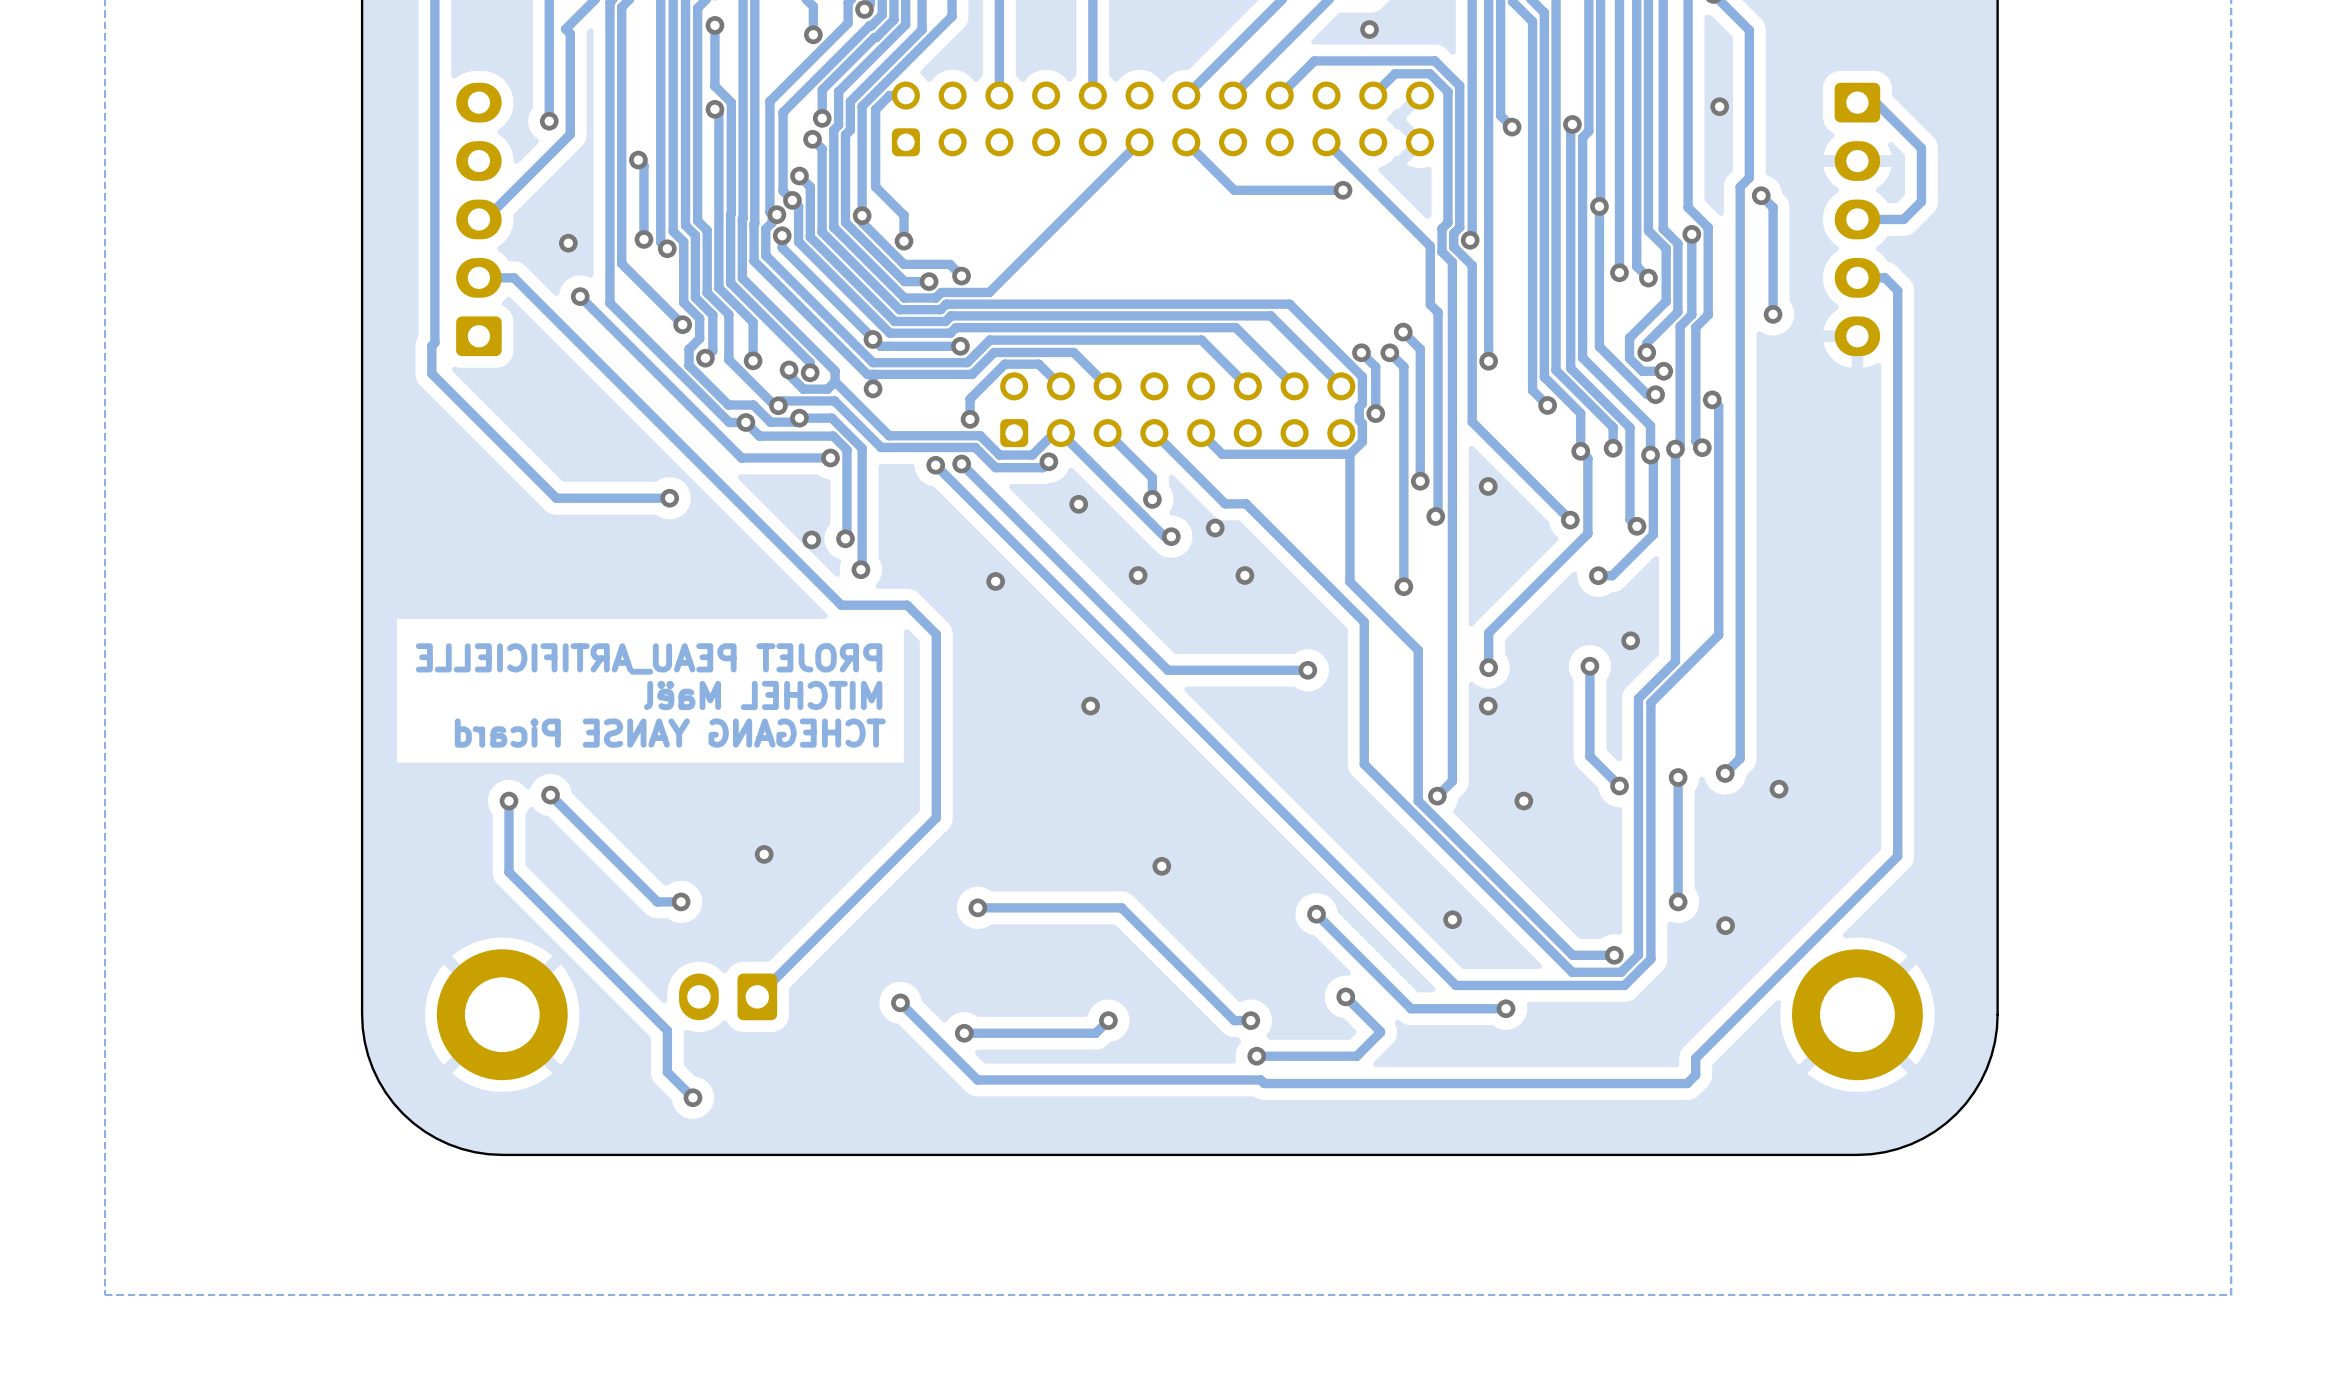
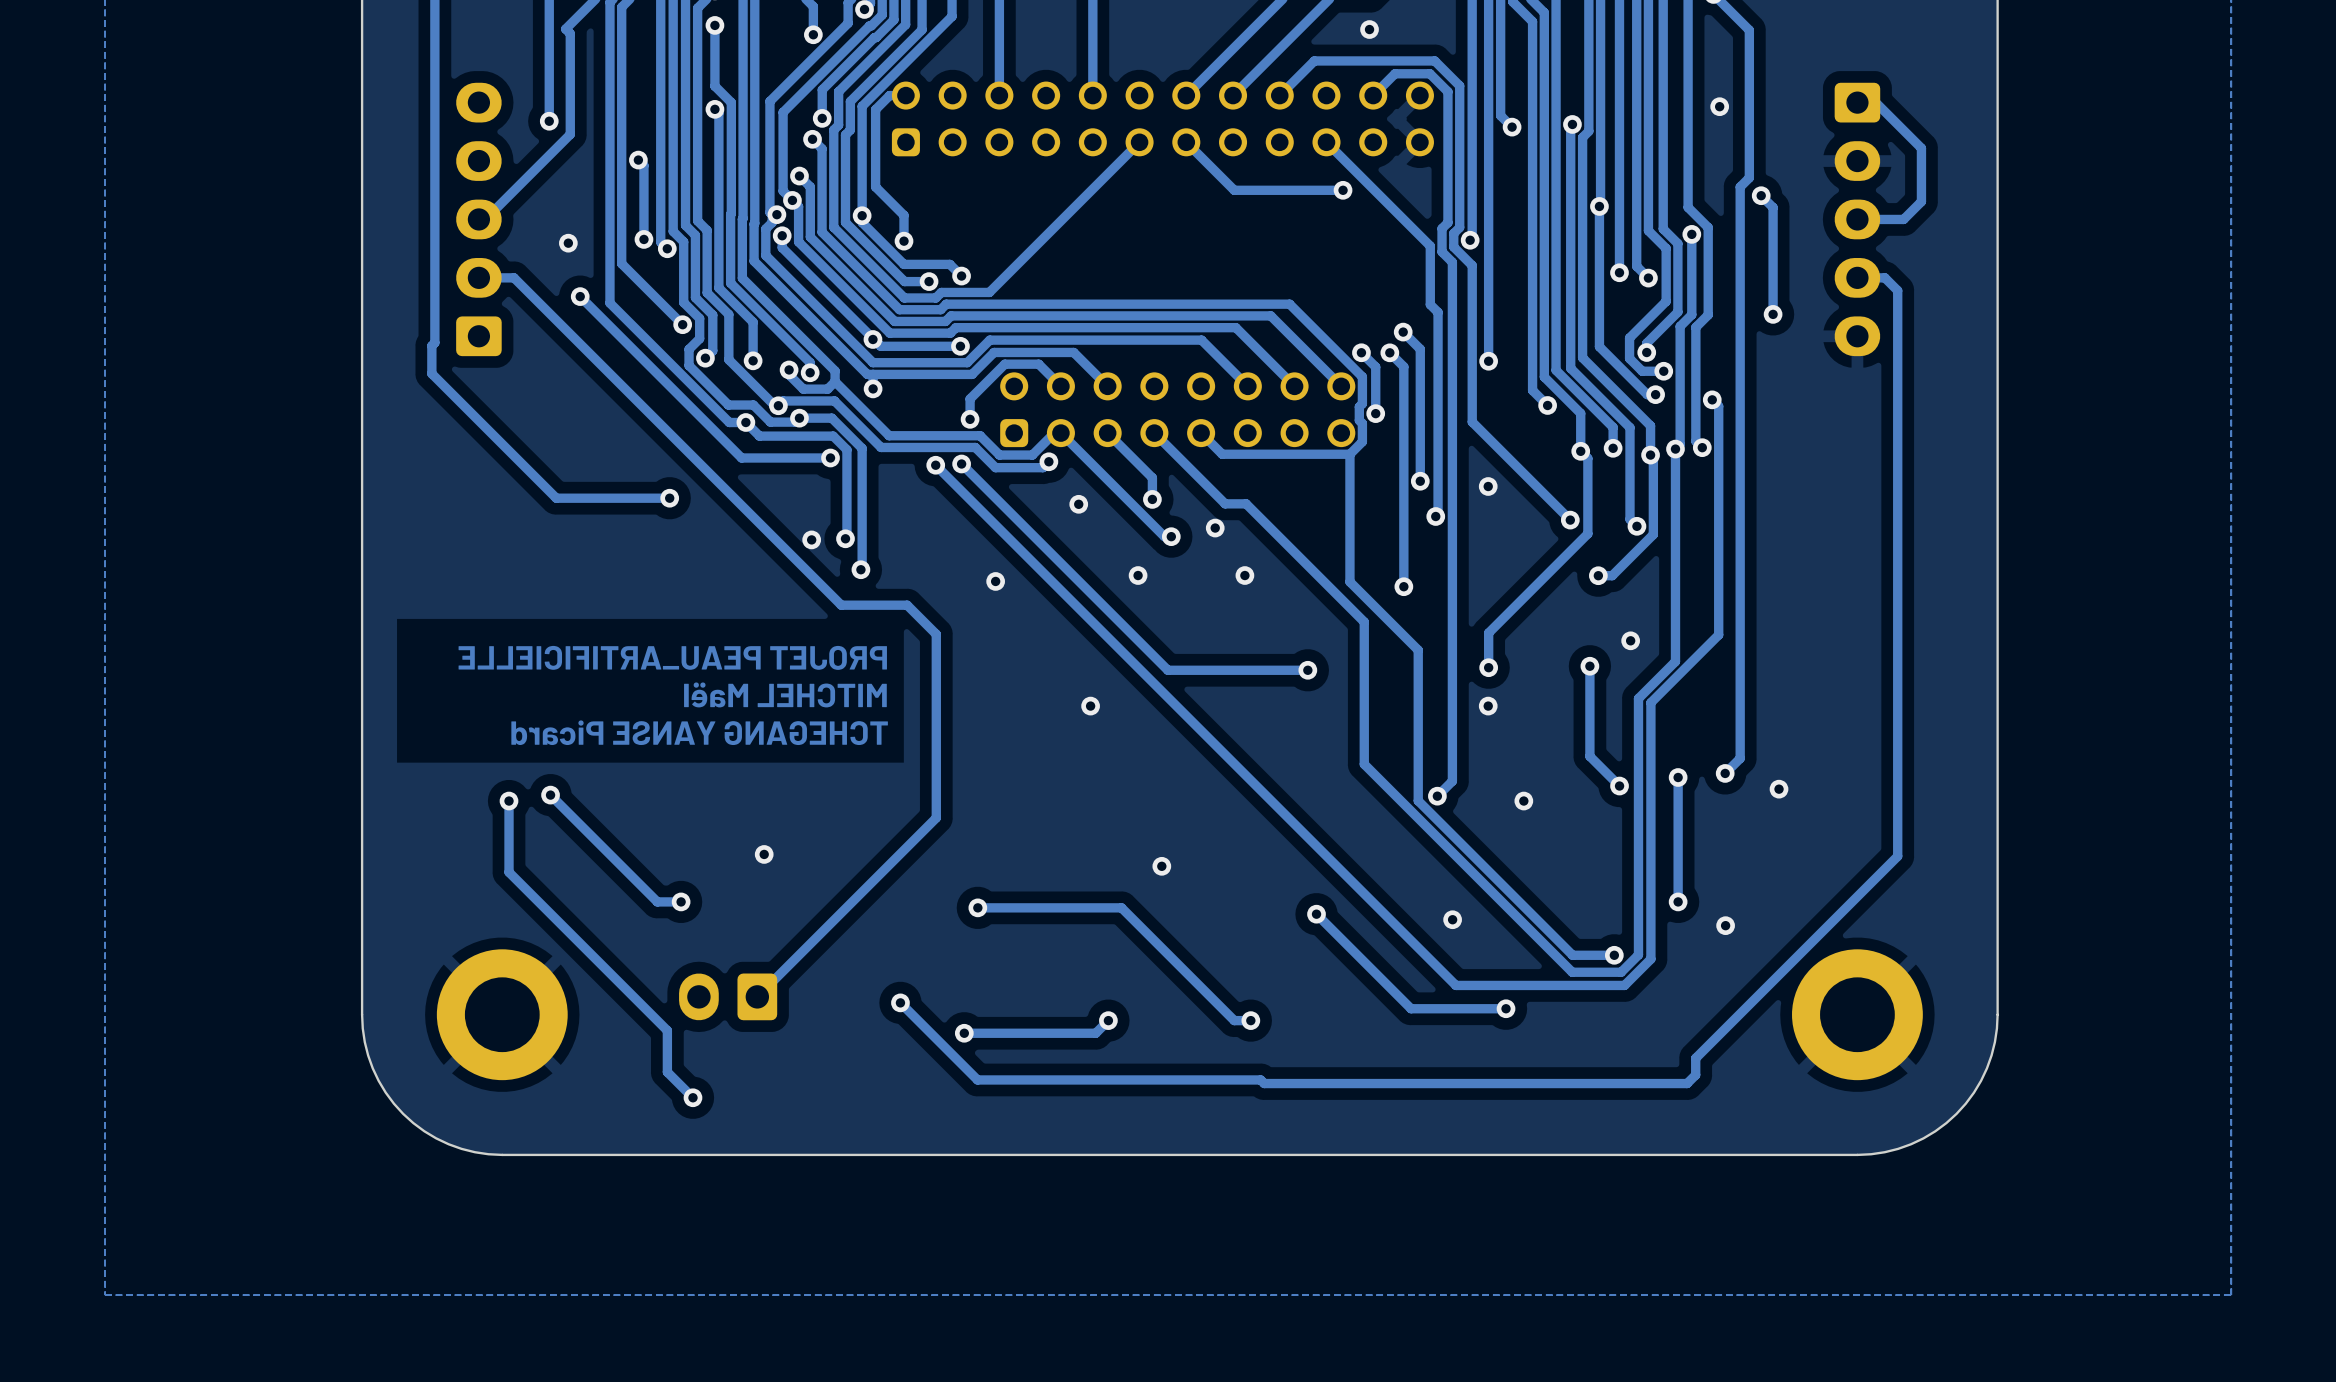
track: (1345, 996) (1380, 1031) (1356, 1056) (1256, 1056) -> none
via: (1345, 996) -> none
via: (1256, 1056) -> none

